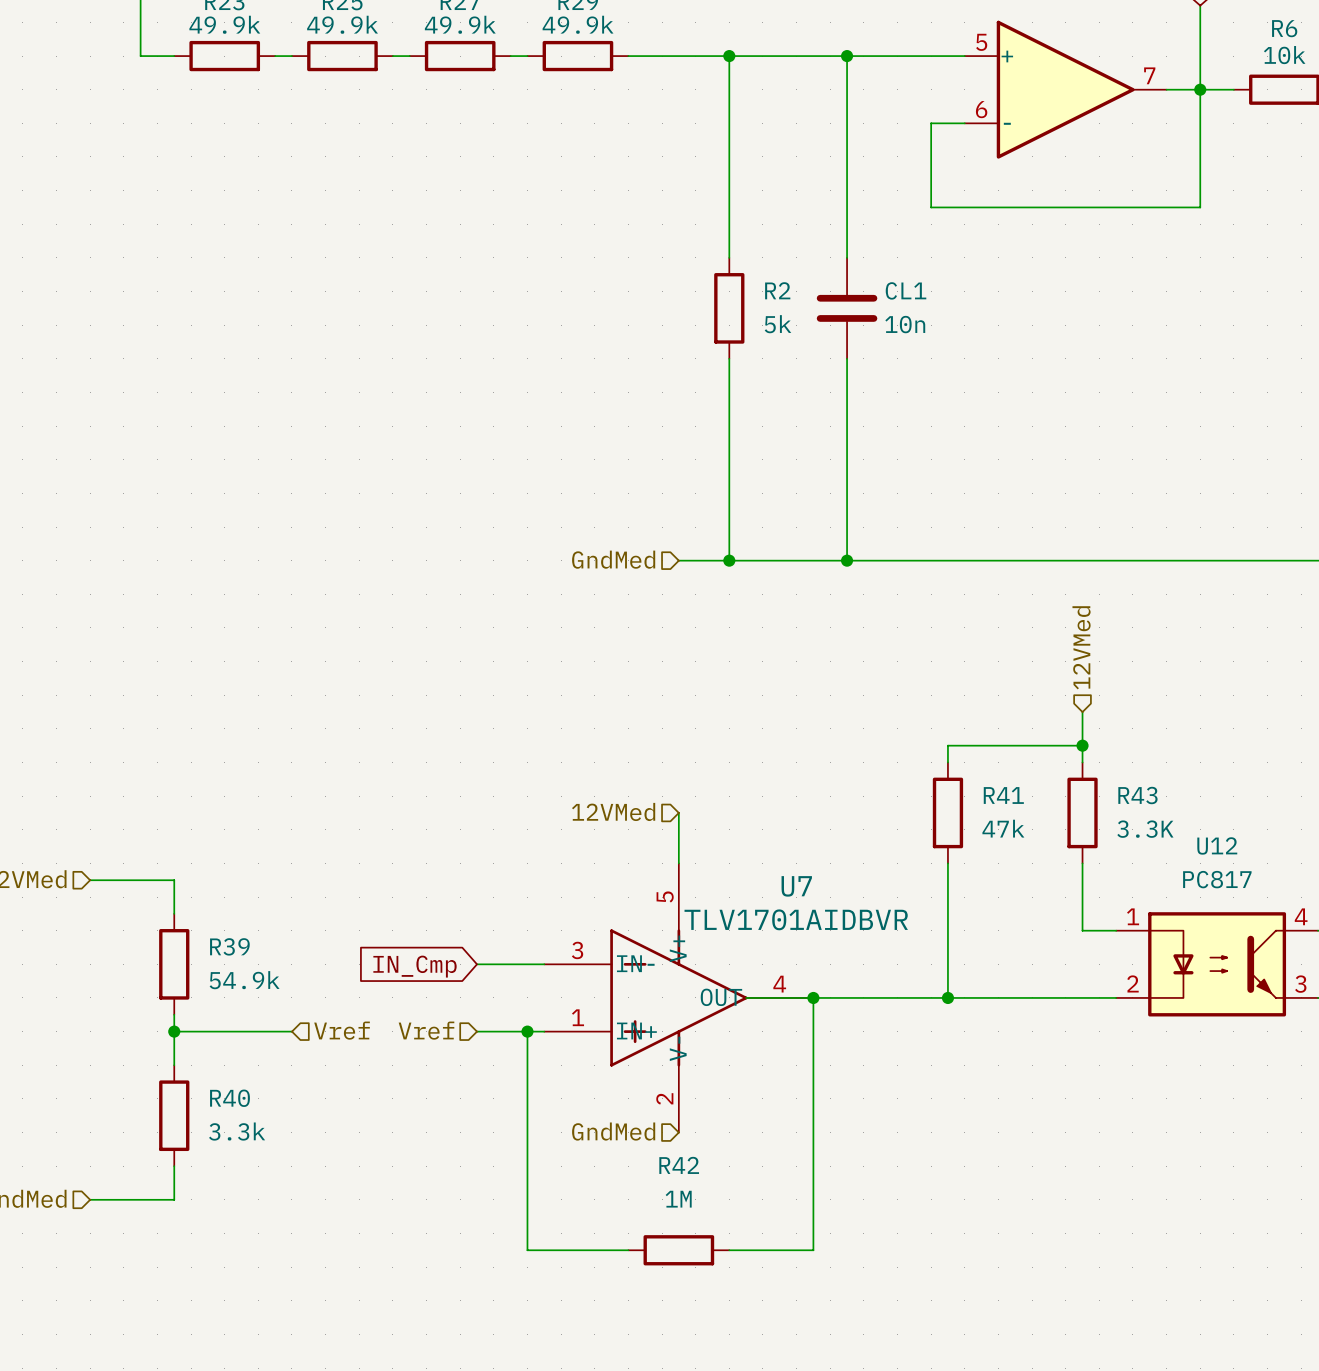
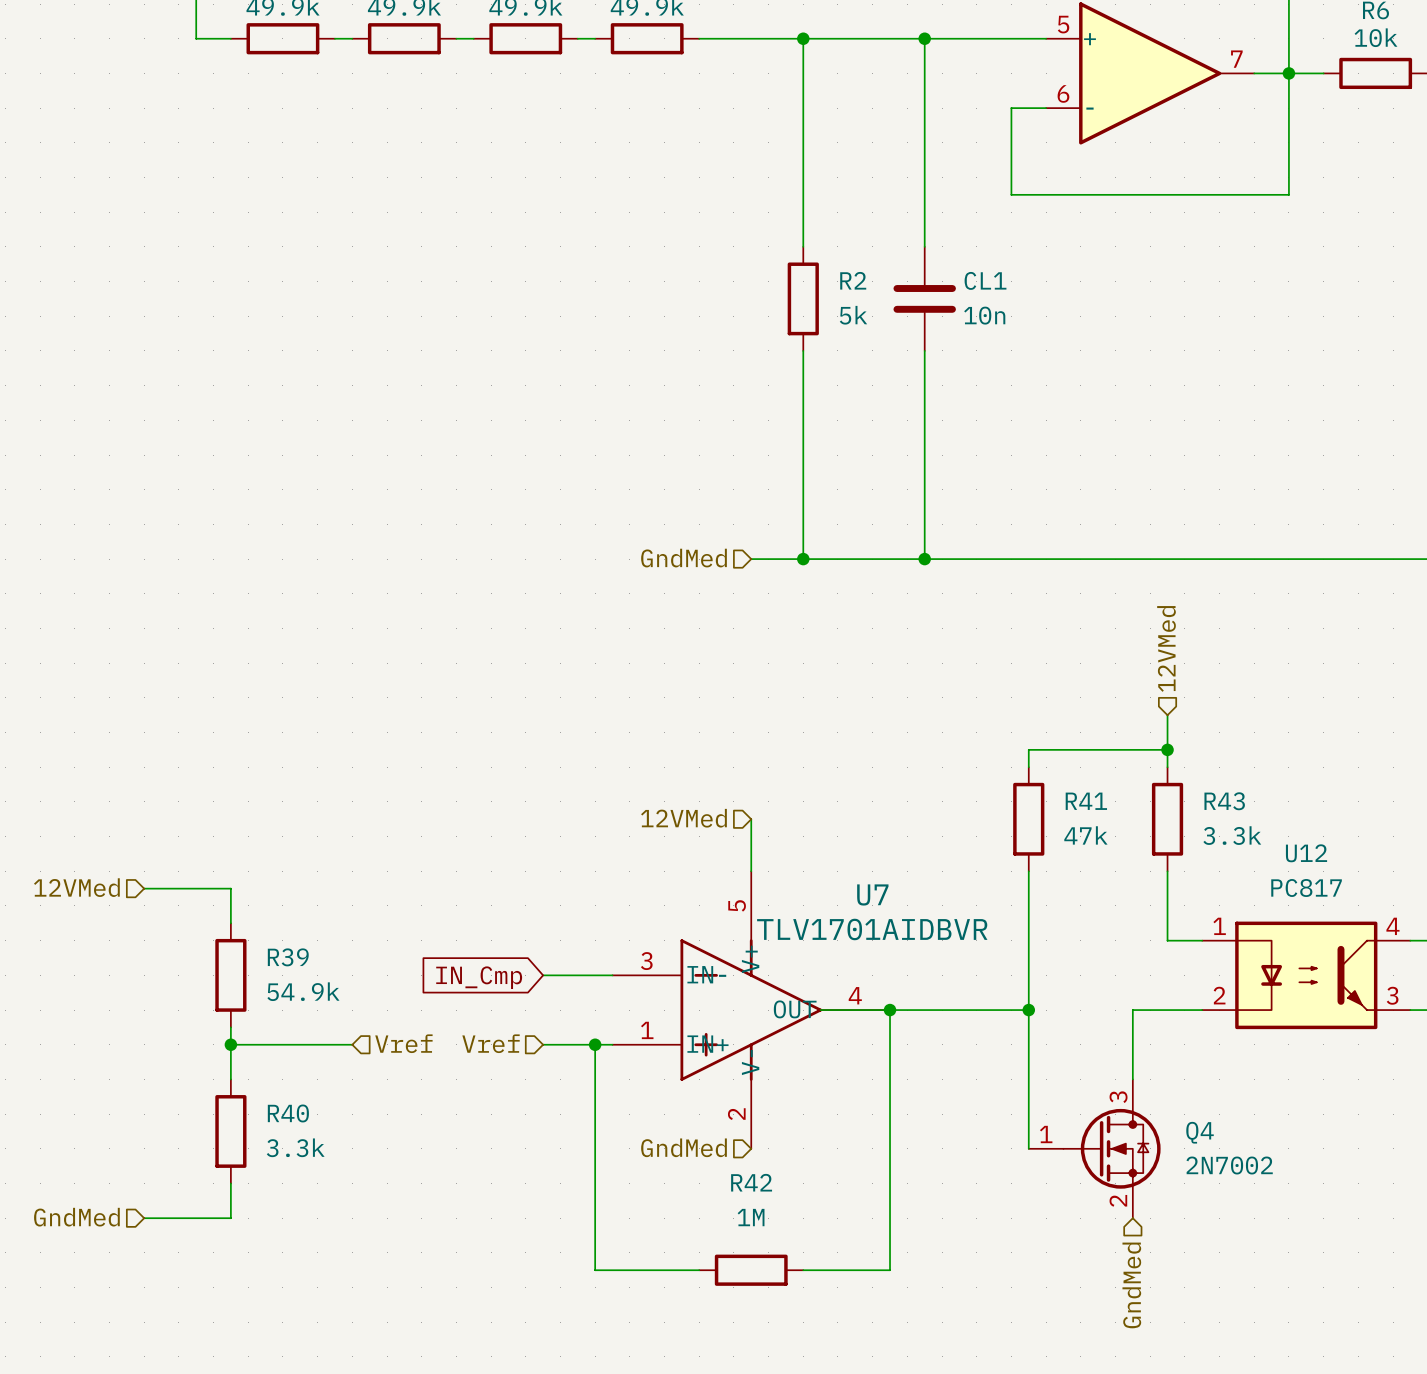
R43 value: 3.3K (1145, 829) -> 3.3k (1232, 835)
wire: (947, 997) (1048, 997) -> (1132, 1079) (1132, 1010)
wire: none -> (1028, 1010) (1028, 1148)
Q4: none -> 2N7002 (1094, 1148)
hierarchical label: none -> GndMed (1131, 1285)

